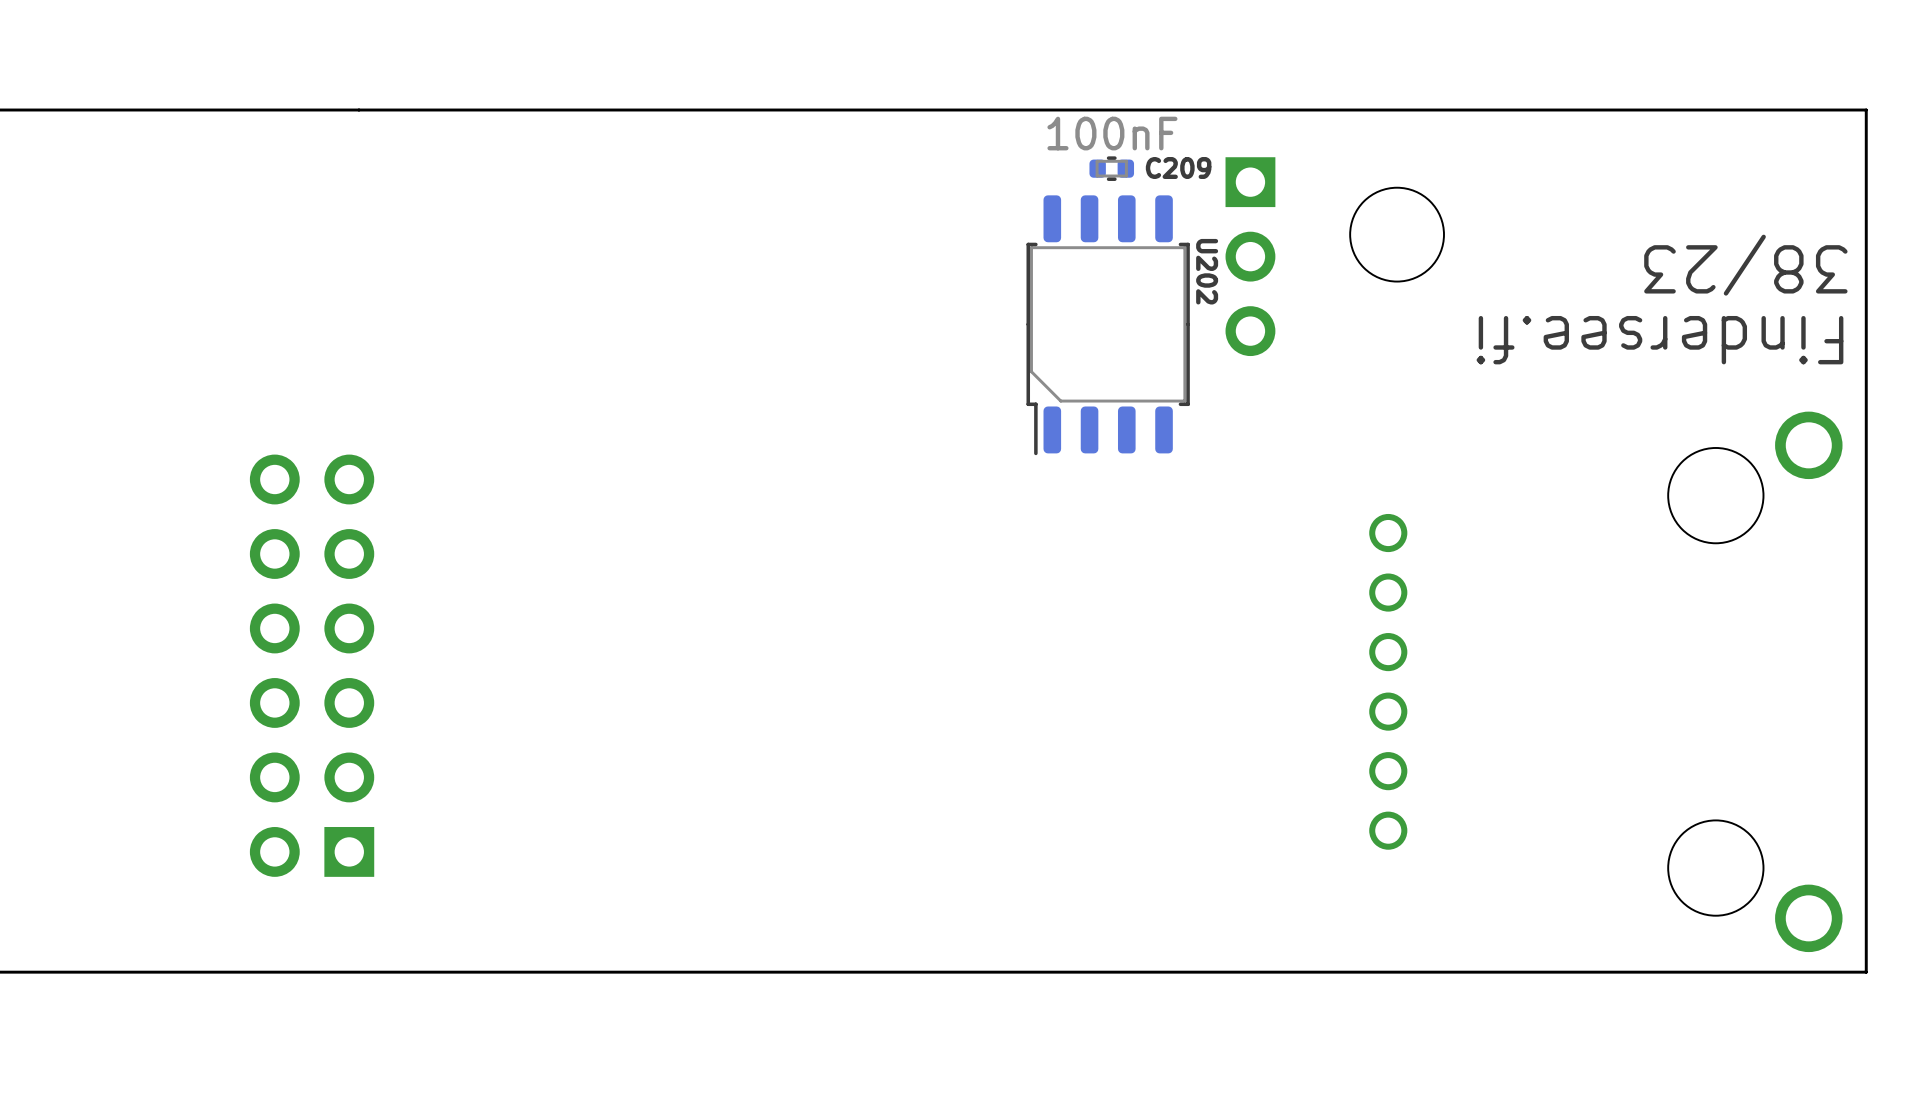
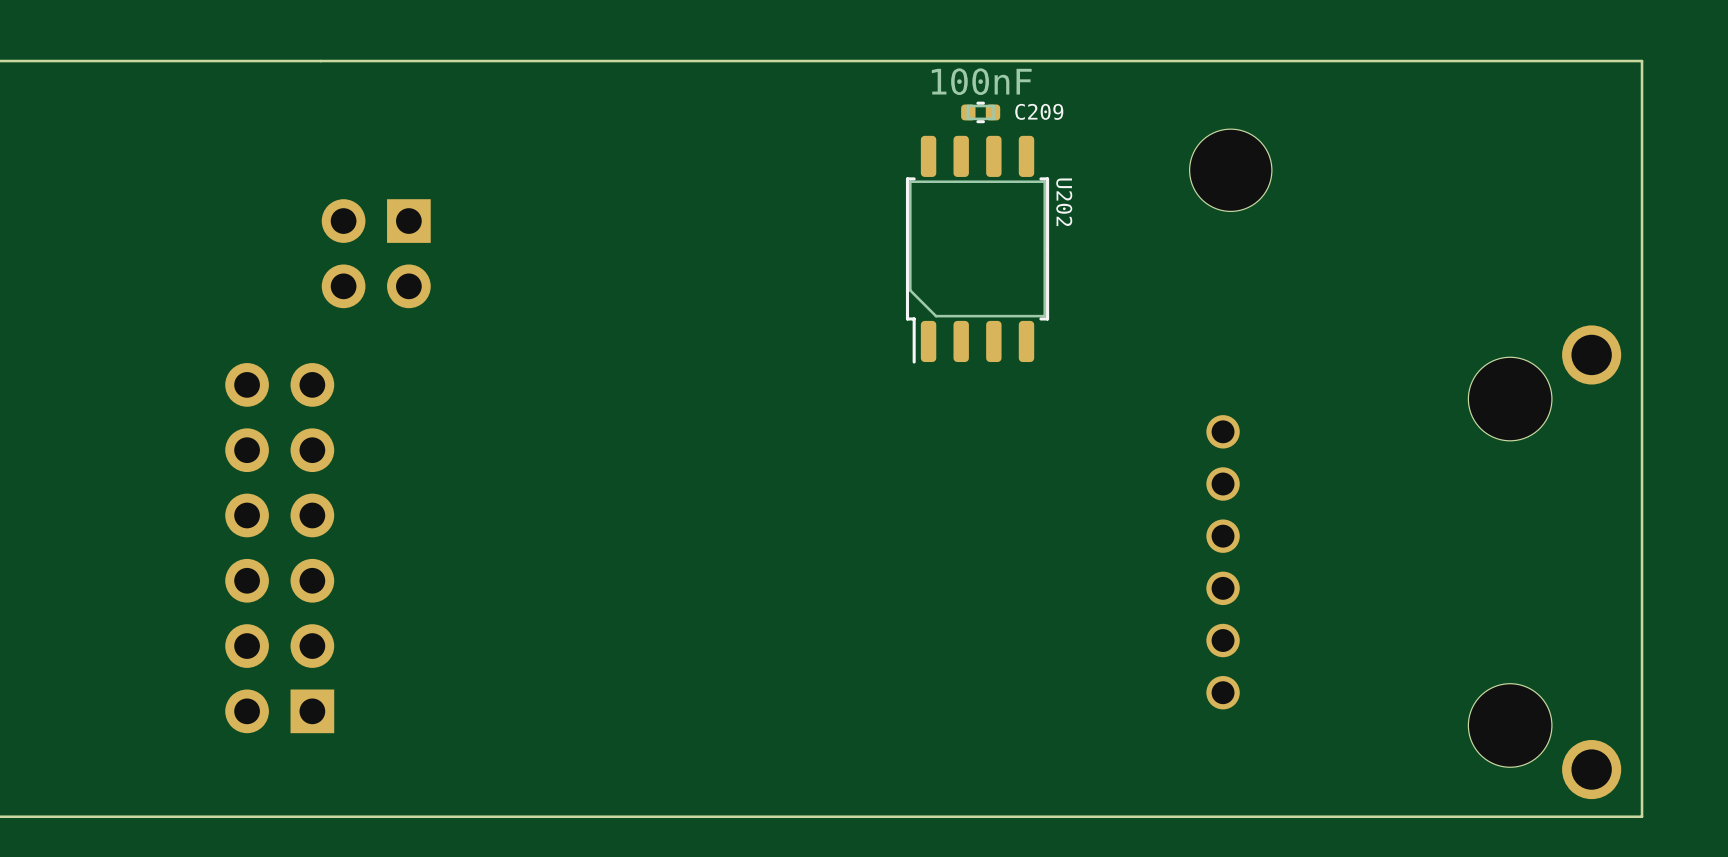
part: (1250, 256) -> none
text: 38/23 (1745, 265) -> none
part: none -> (376, 253)
text: Findersee.fi (1659, 340) -> none

